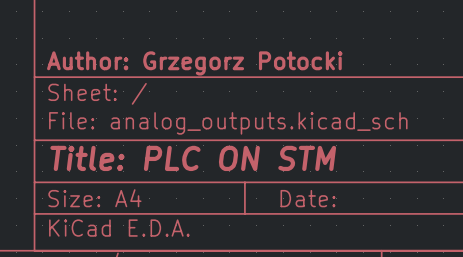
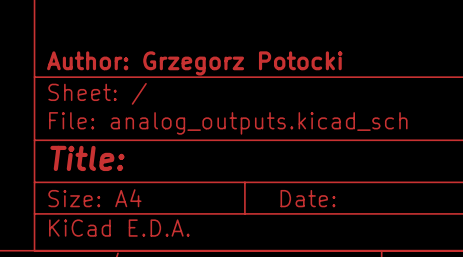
title block: Title: PLC ON STM (193, 158) -> Title: (87, 158)

